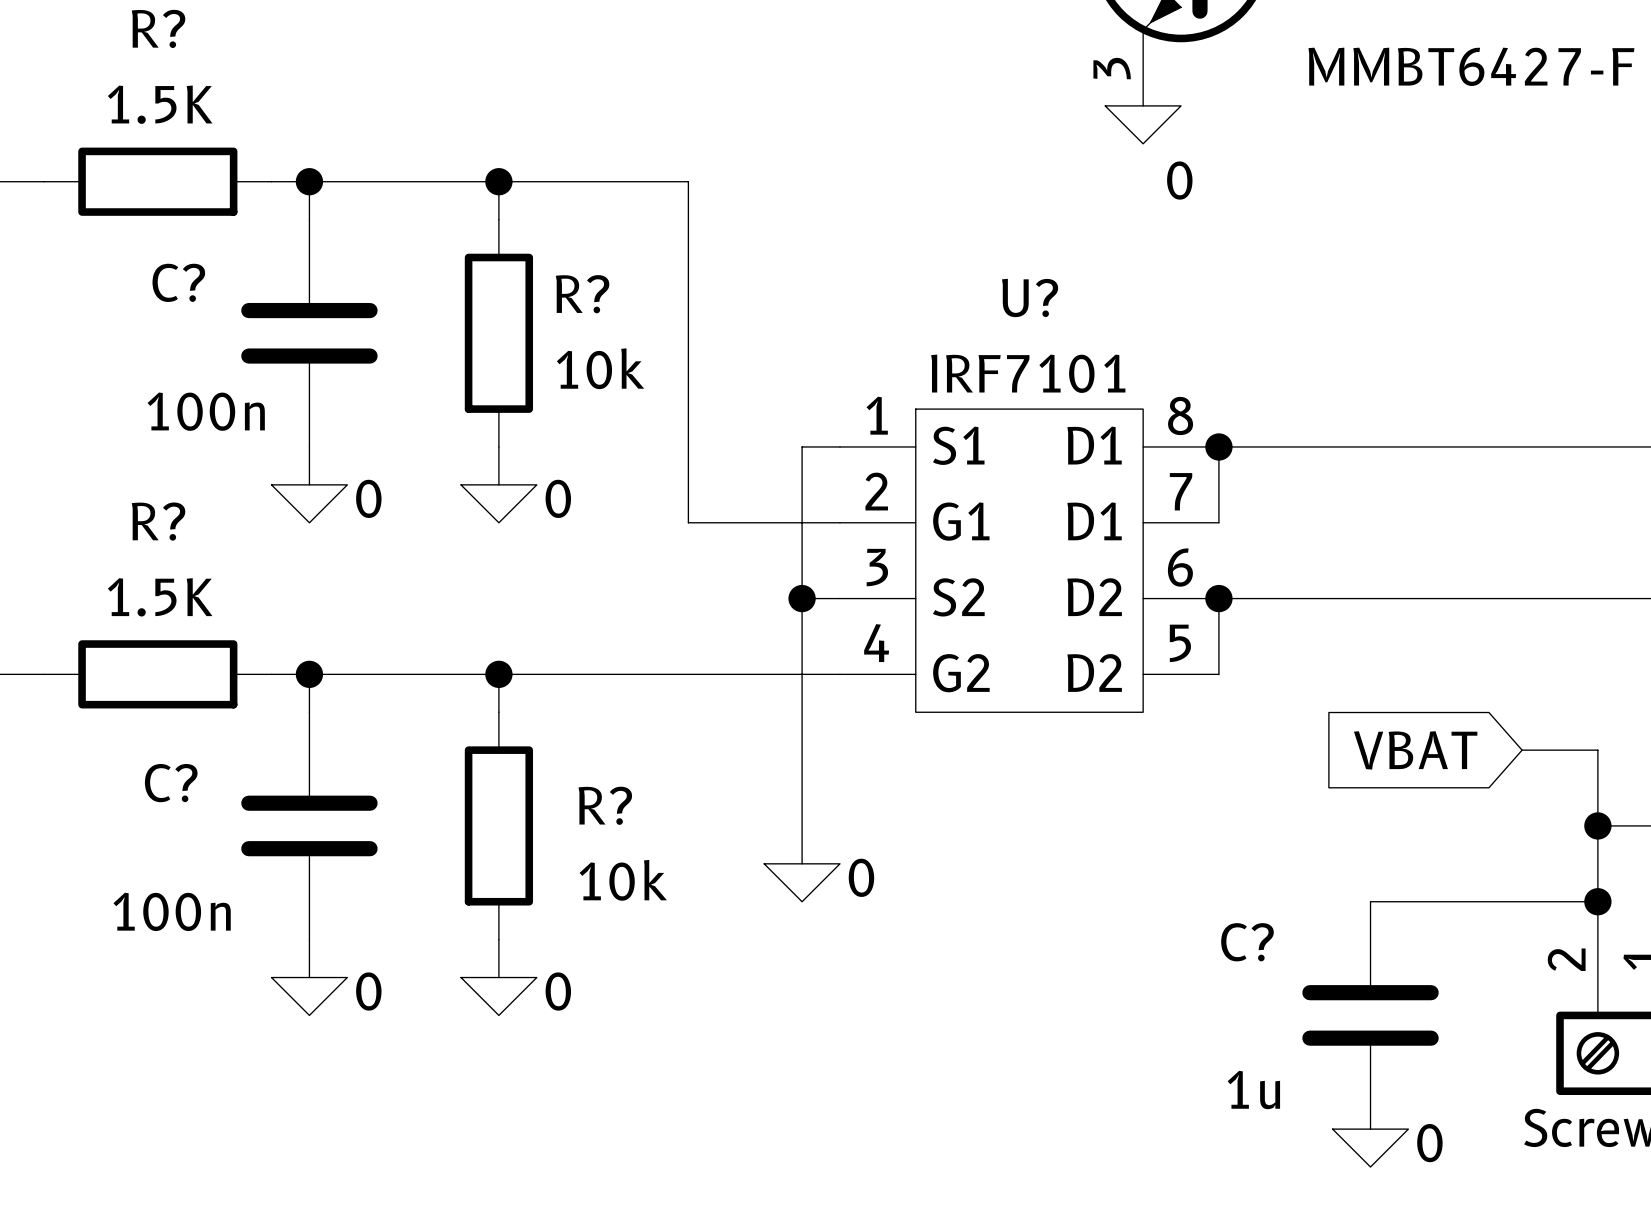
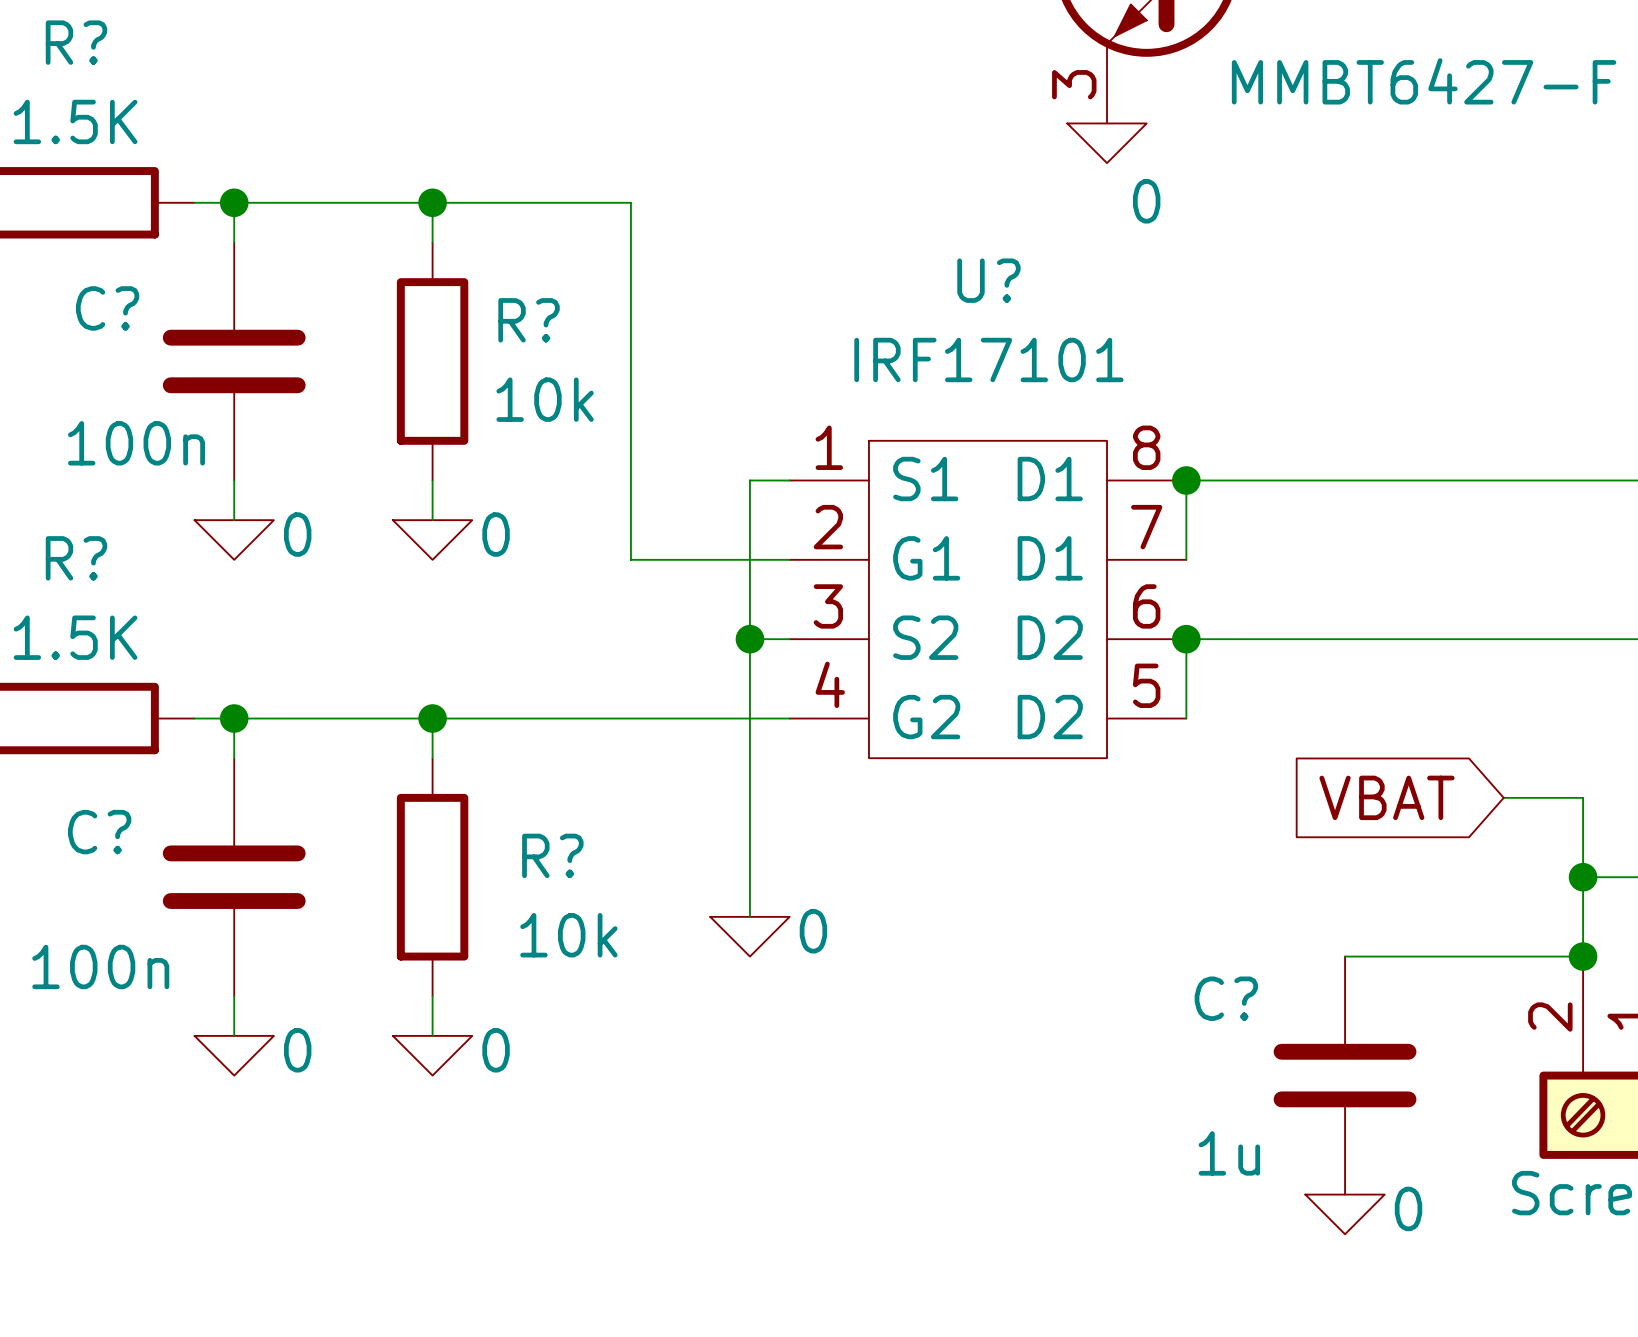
U? name position: U? (1030, 297) -> U? (988, 280)
U? value: IRF7101 (1028, 373) -> IRF17101 (988, 359)

